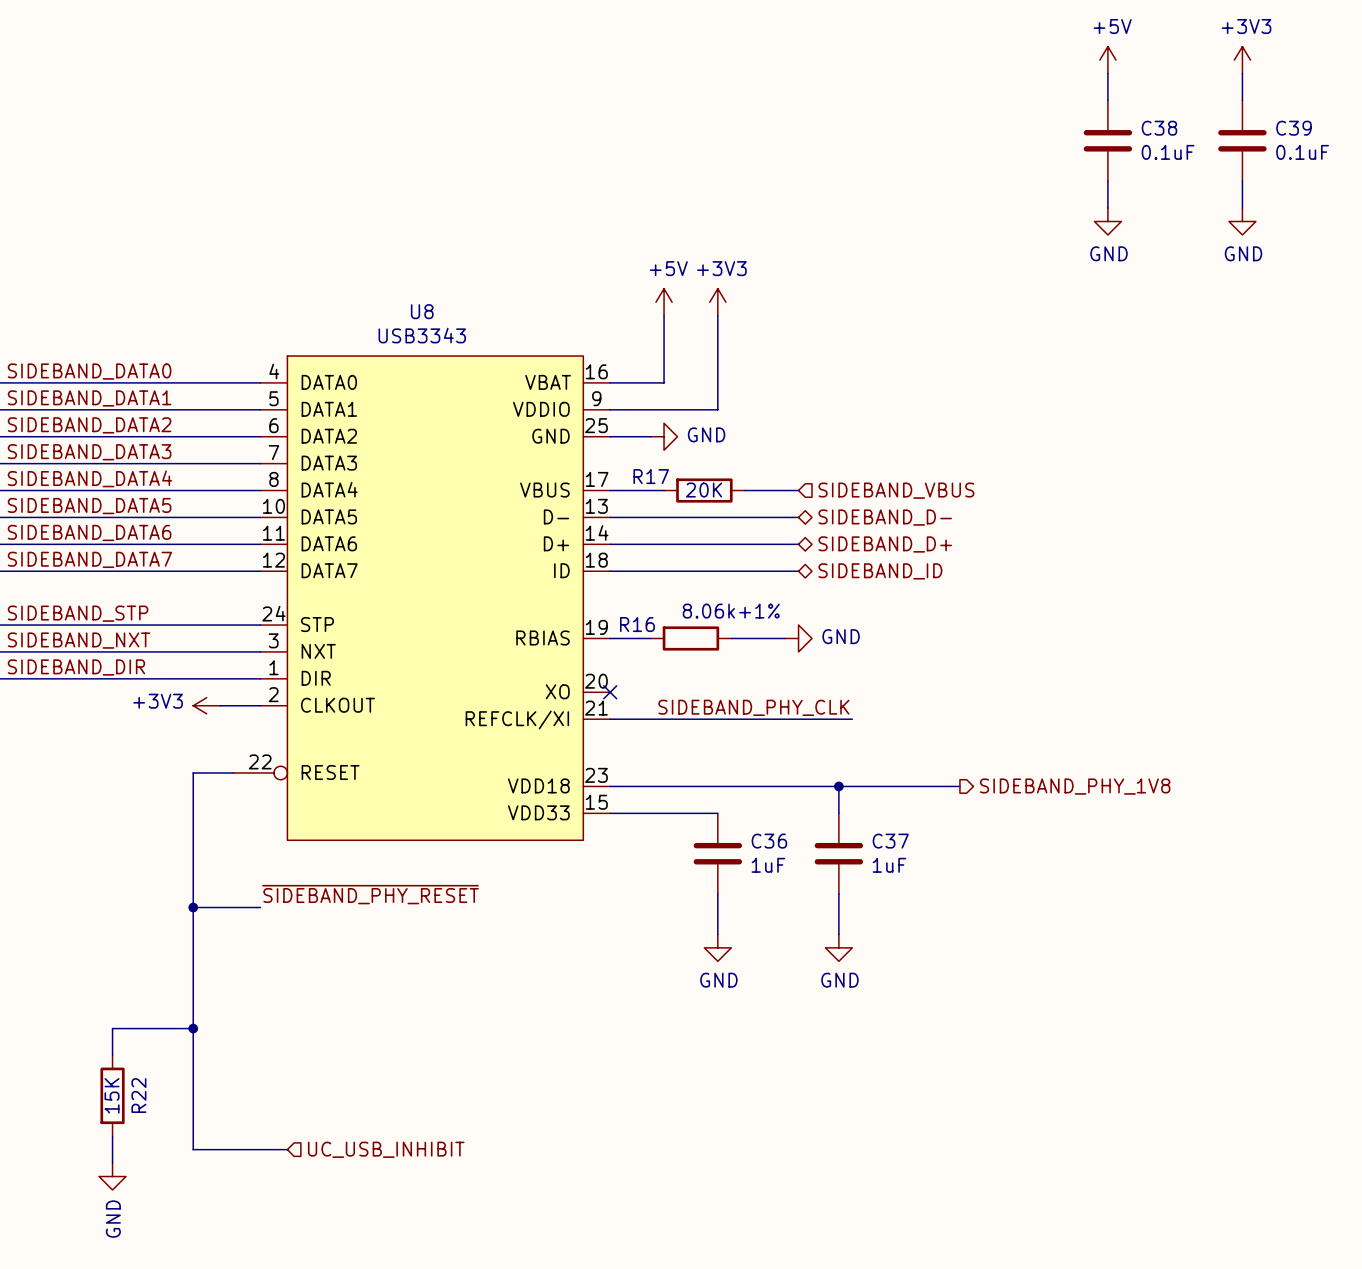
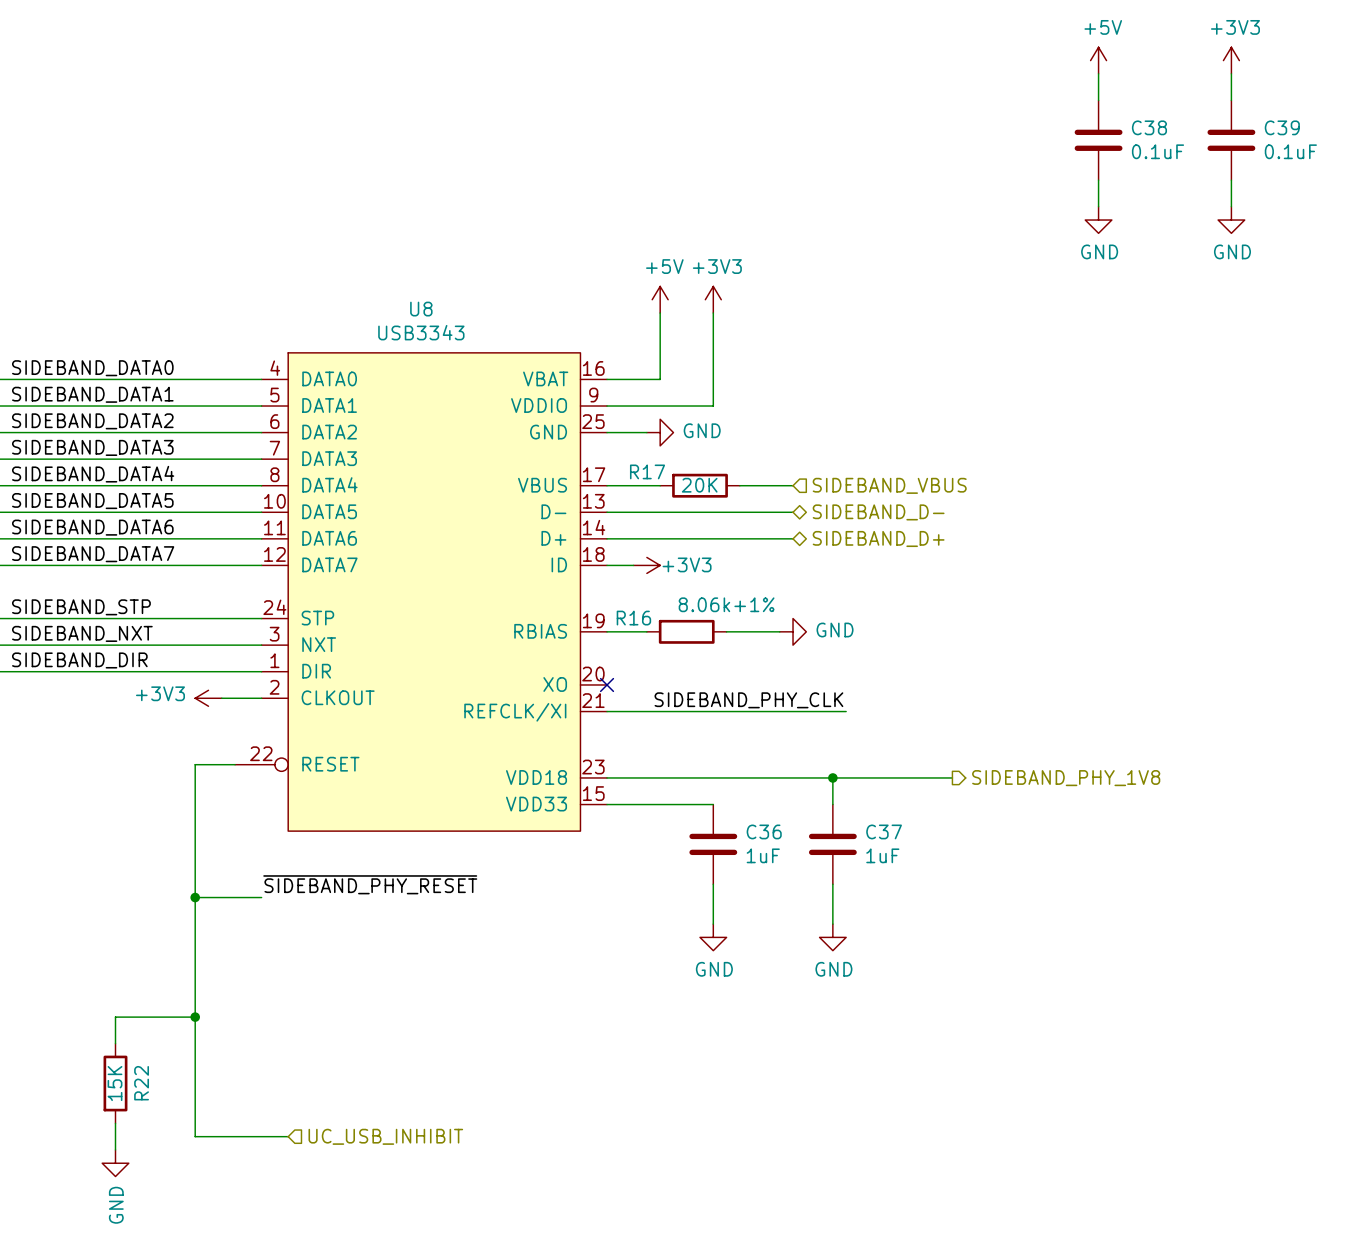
wire: (637, 571) (798, 571) -> none
power symbol: none -> +3V3 (646, 565)
hierarchical label: SIDEBAND_ID (880, 571) -> none

